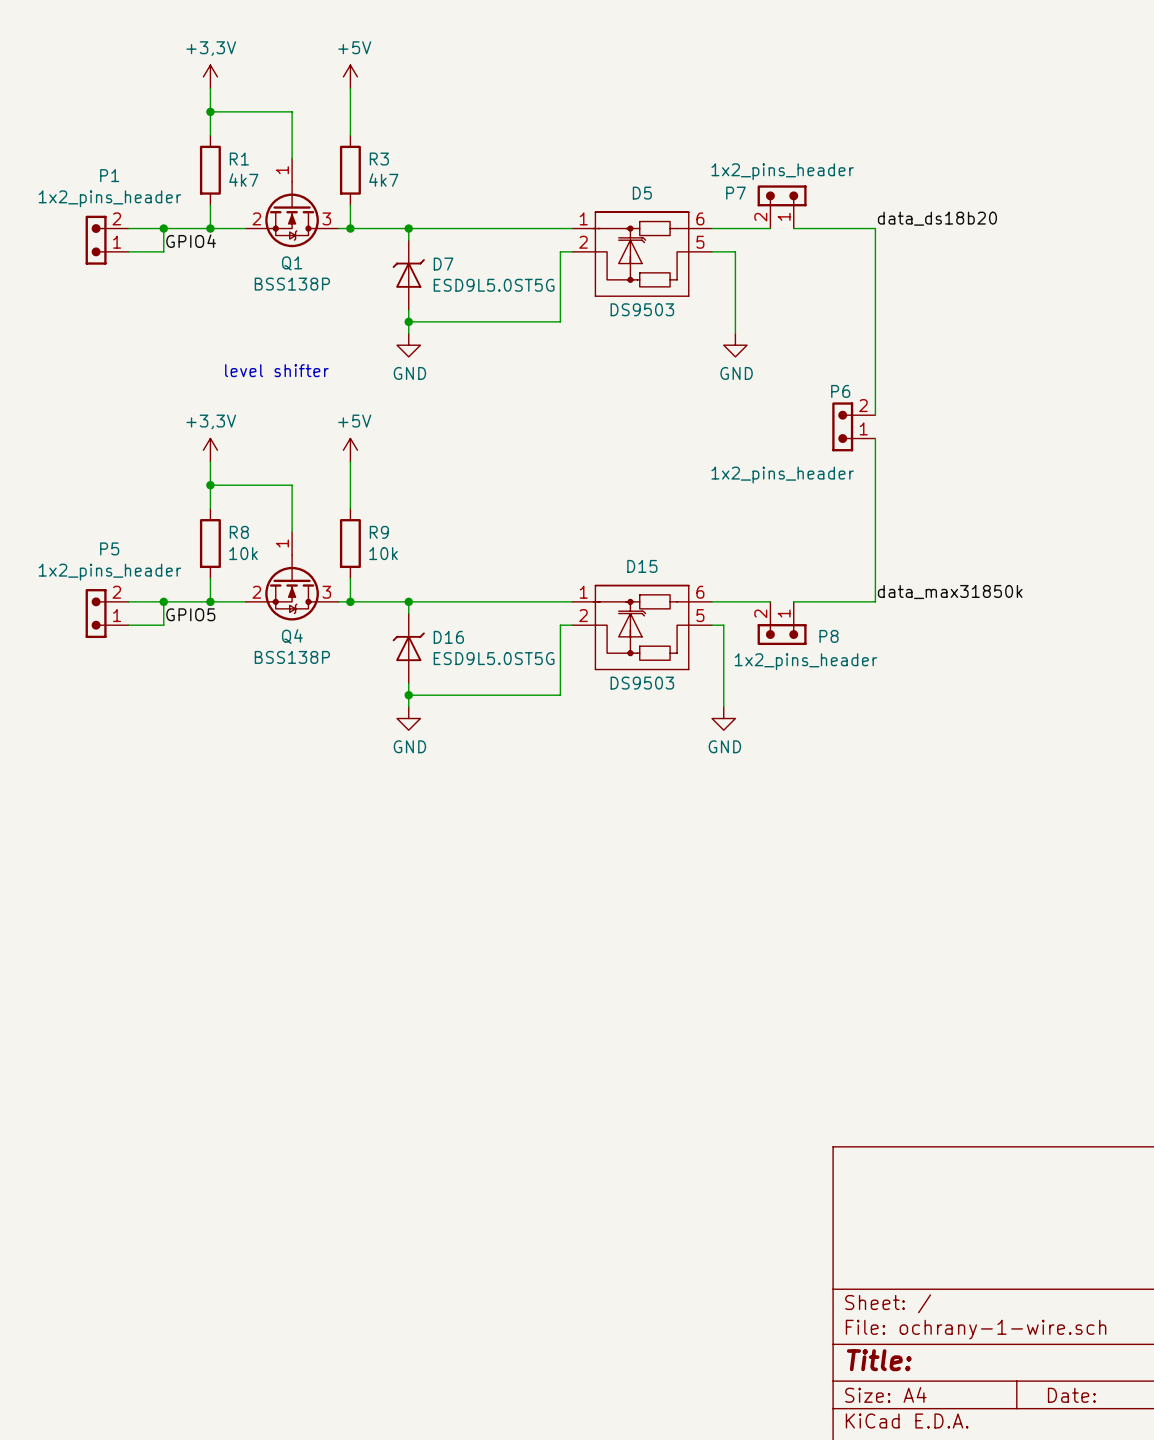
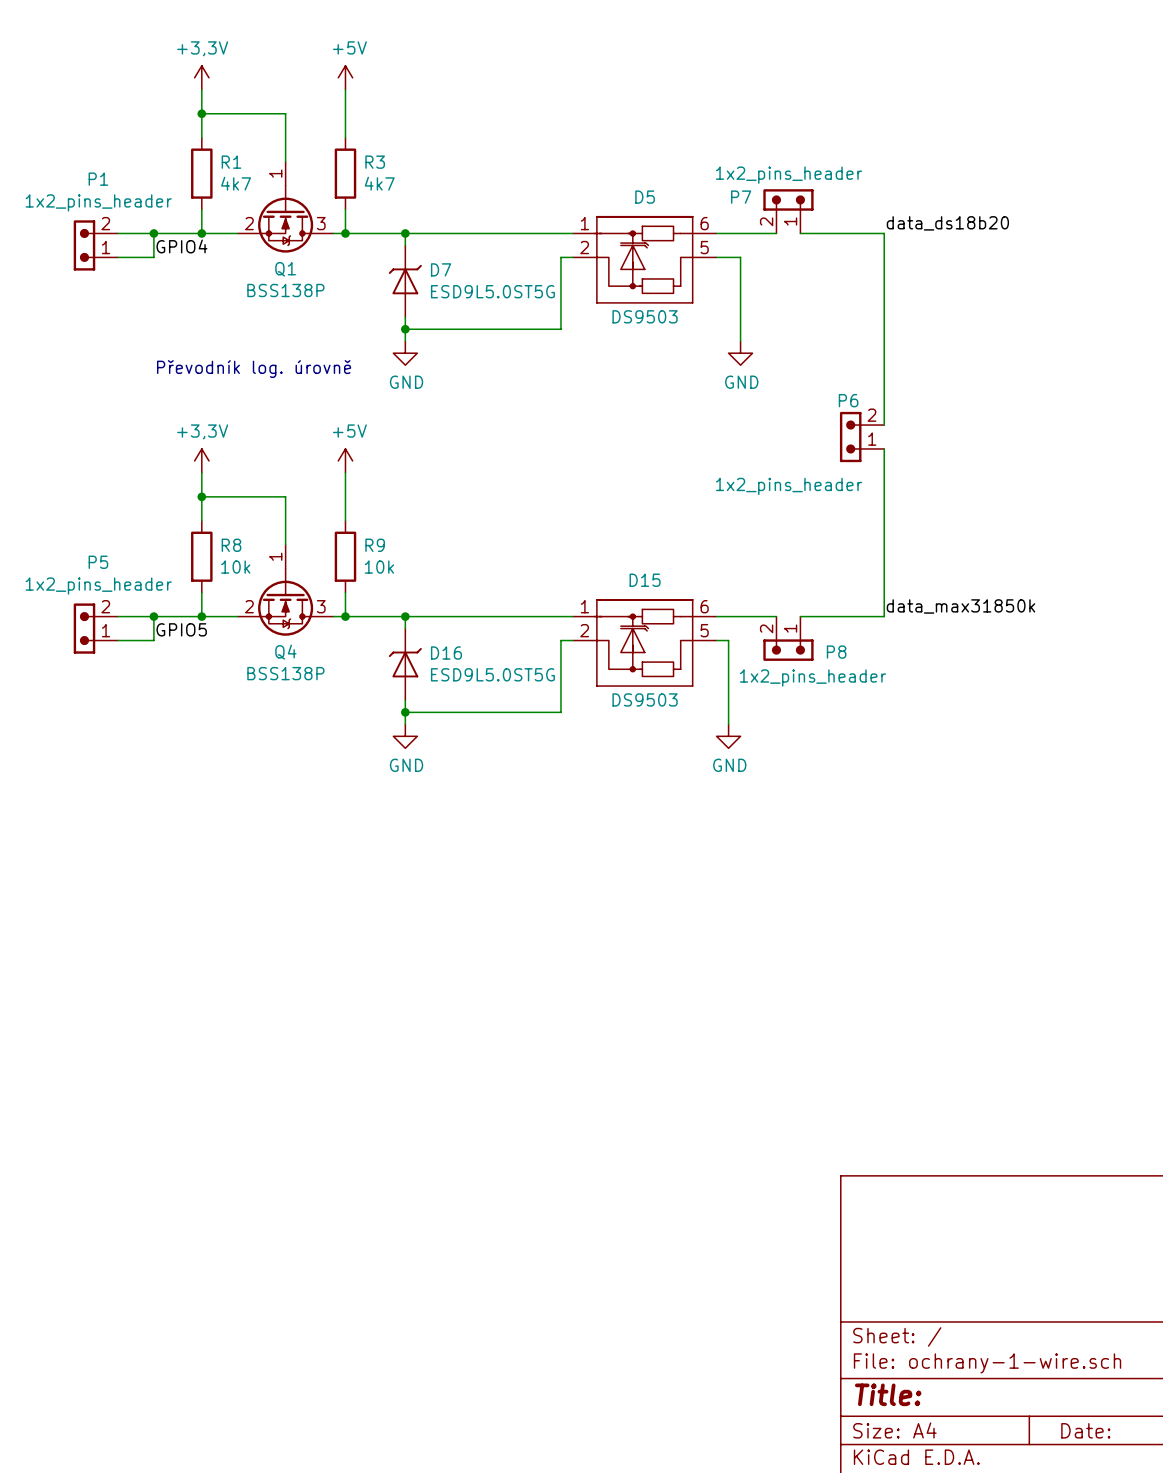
text: none -> Převodník log. úrovně (254, 369)
text: level shifter (276, 370) -> none

